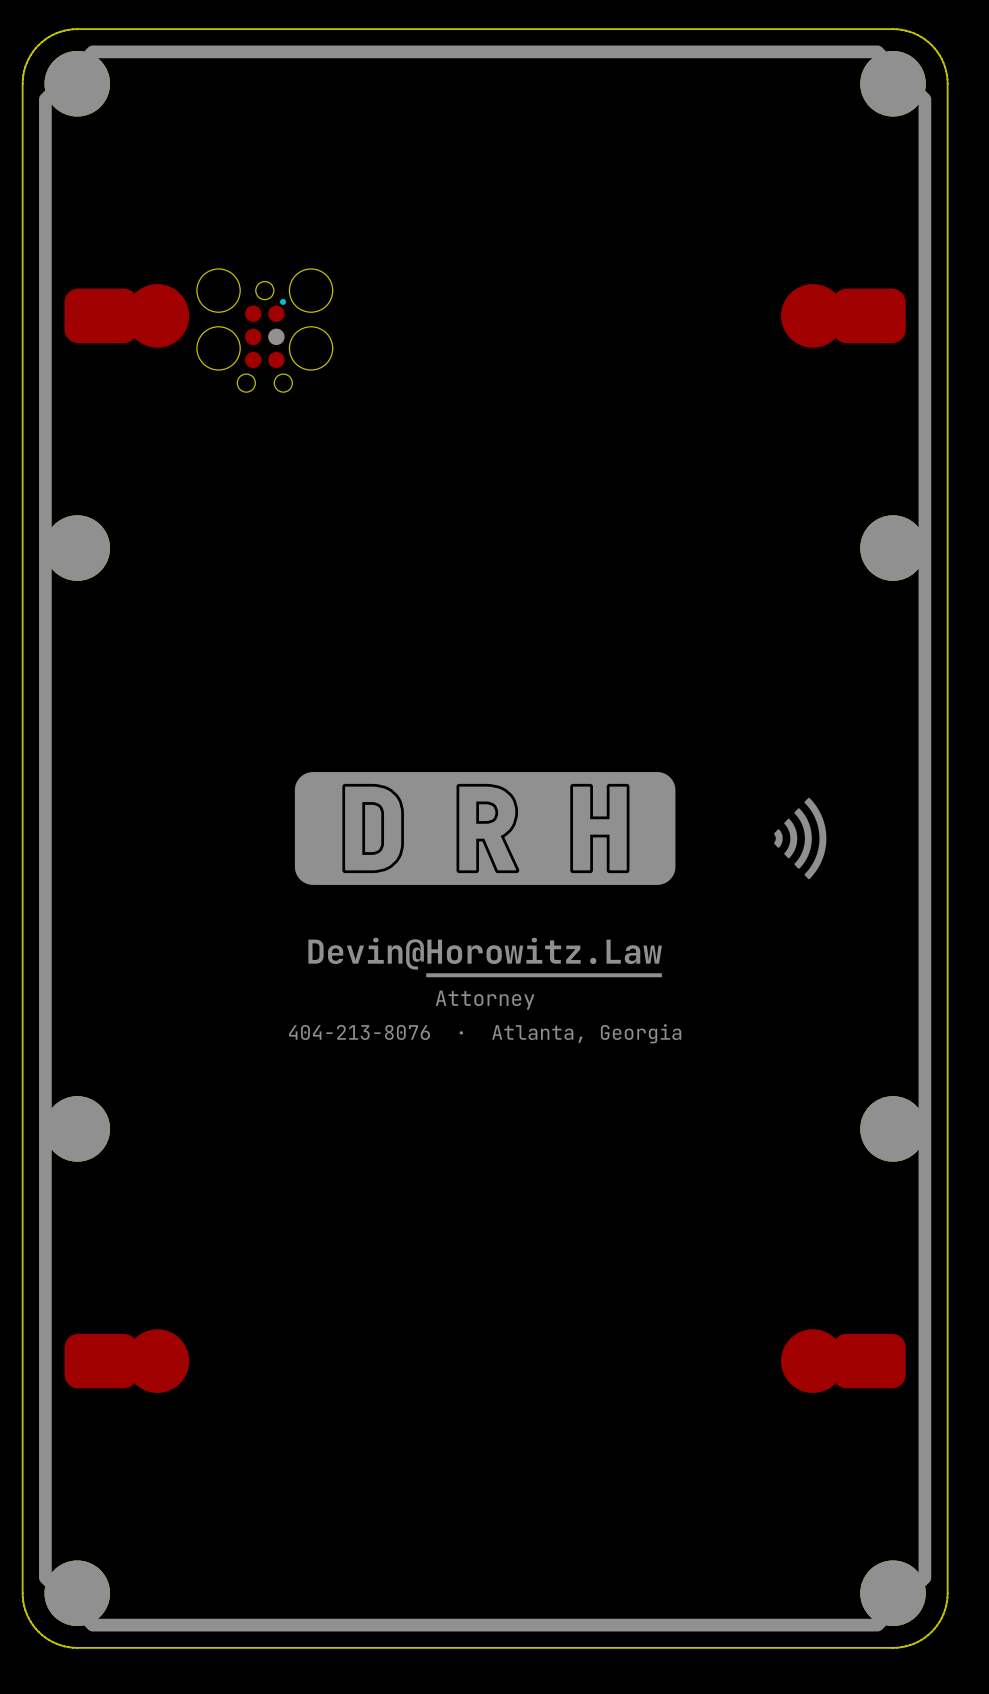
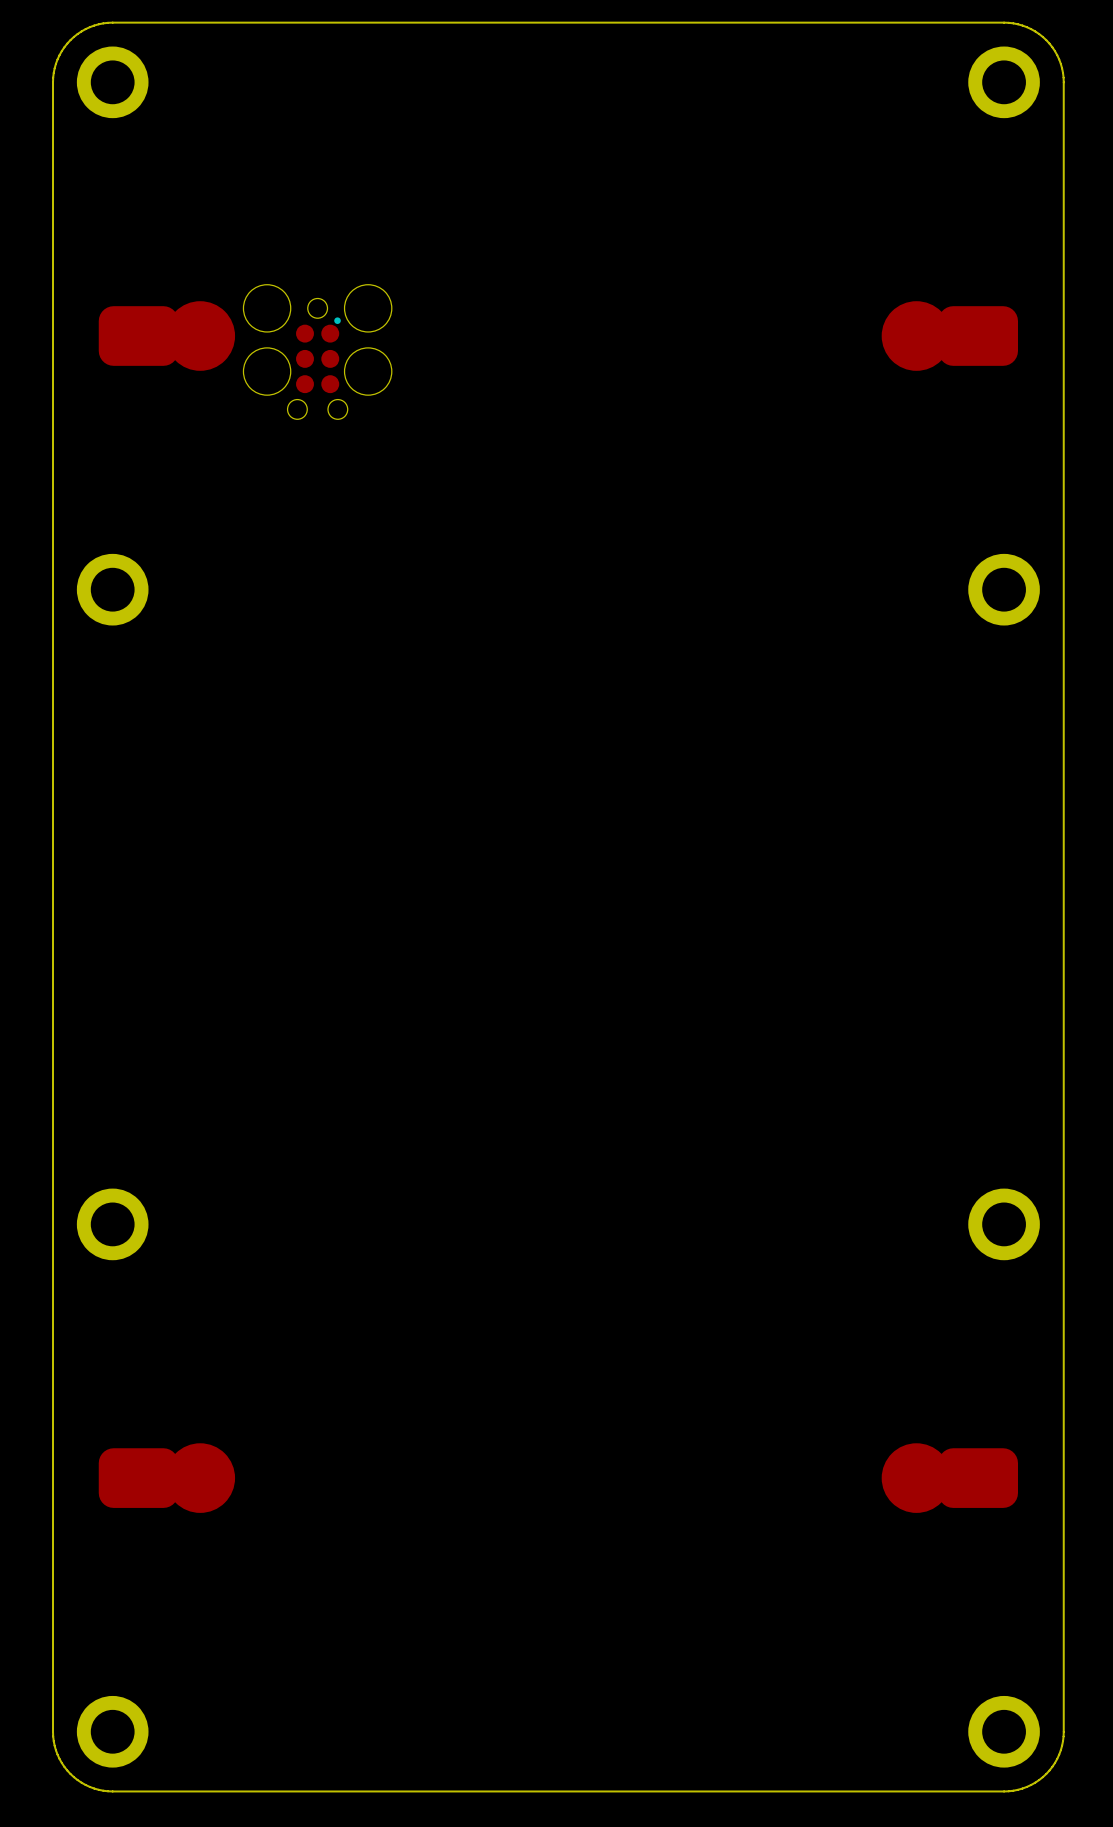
drawing: [39, 45, 932, 1632] -> none

